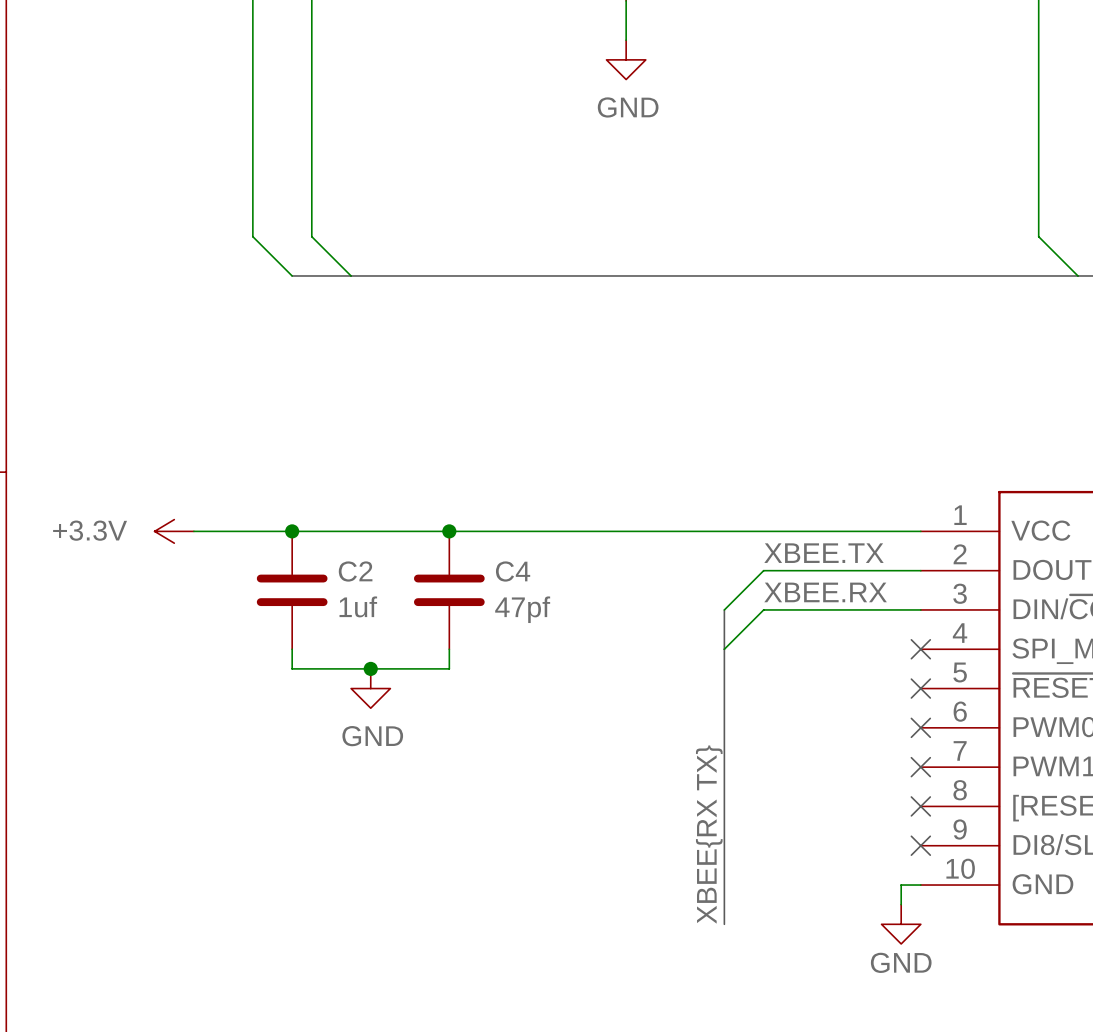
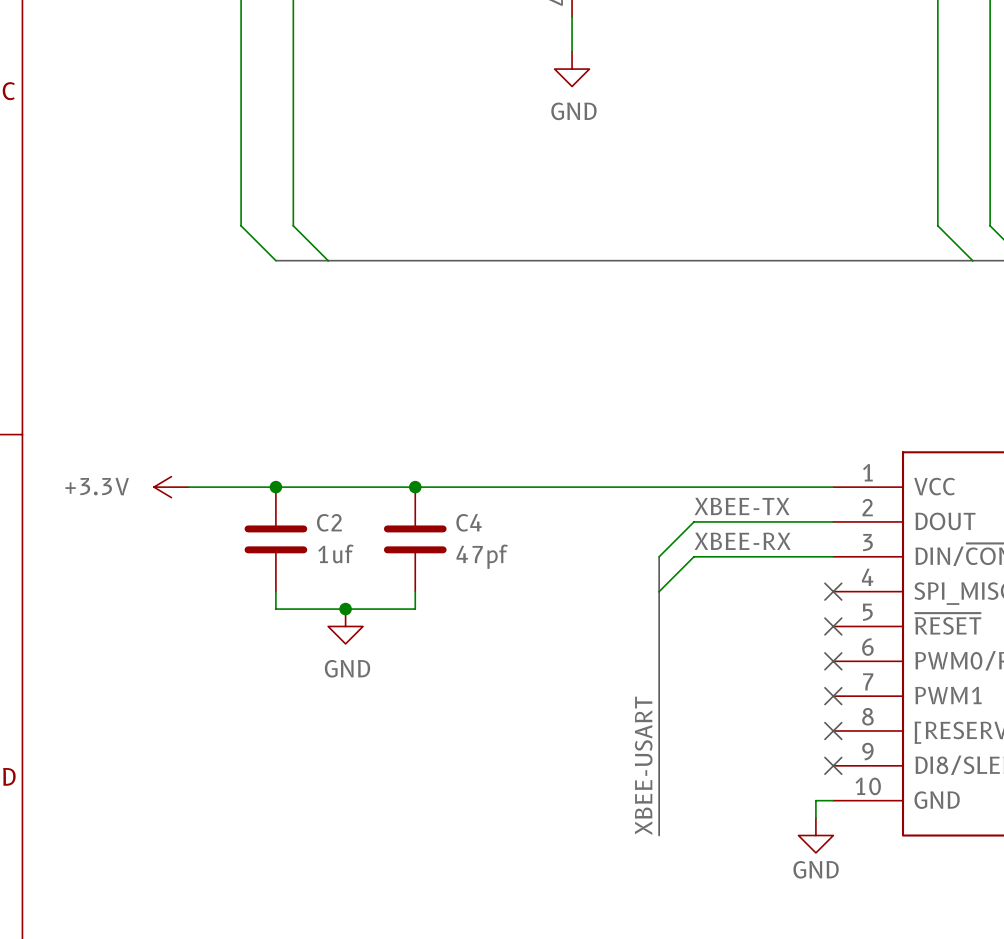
label: XBEE.TX (823, 553) -> XBEE-TX (742, 506)
label: XBEE.RX (825, 592) -> XBEE-RX (742, 541)
label: XBEE{RX TX} (709, 834) -> XBEE-USART (643, 765)

